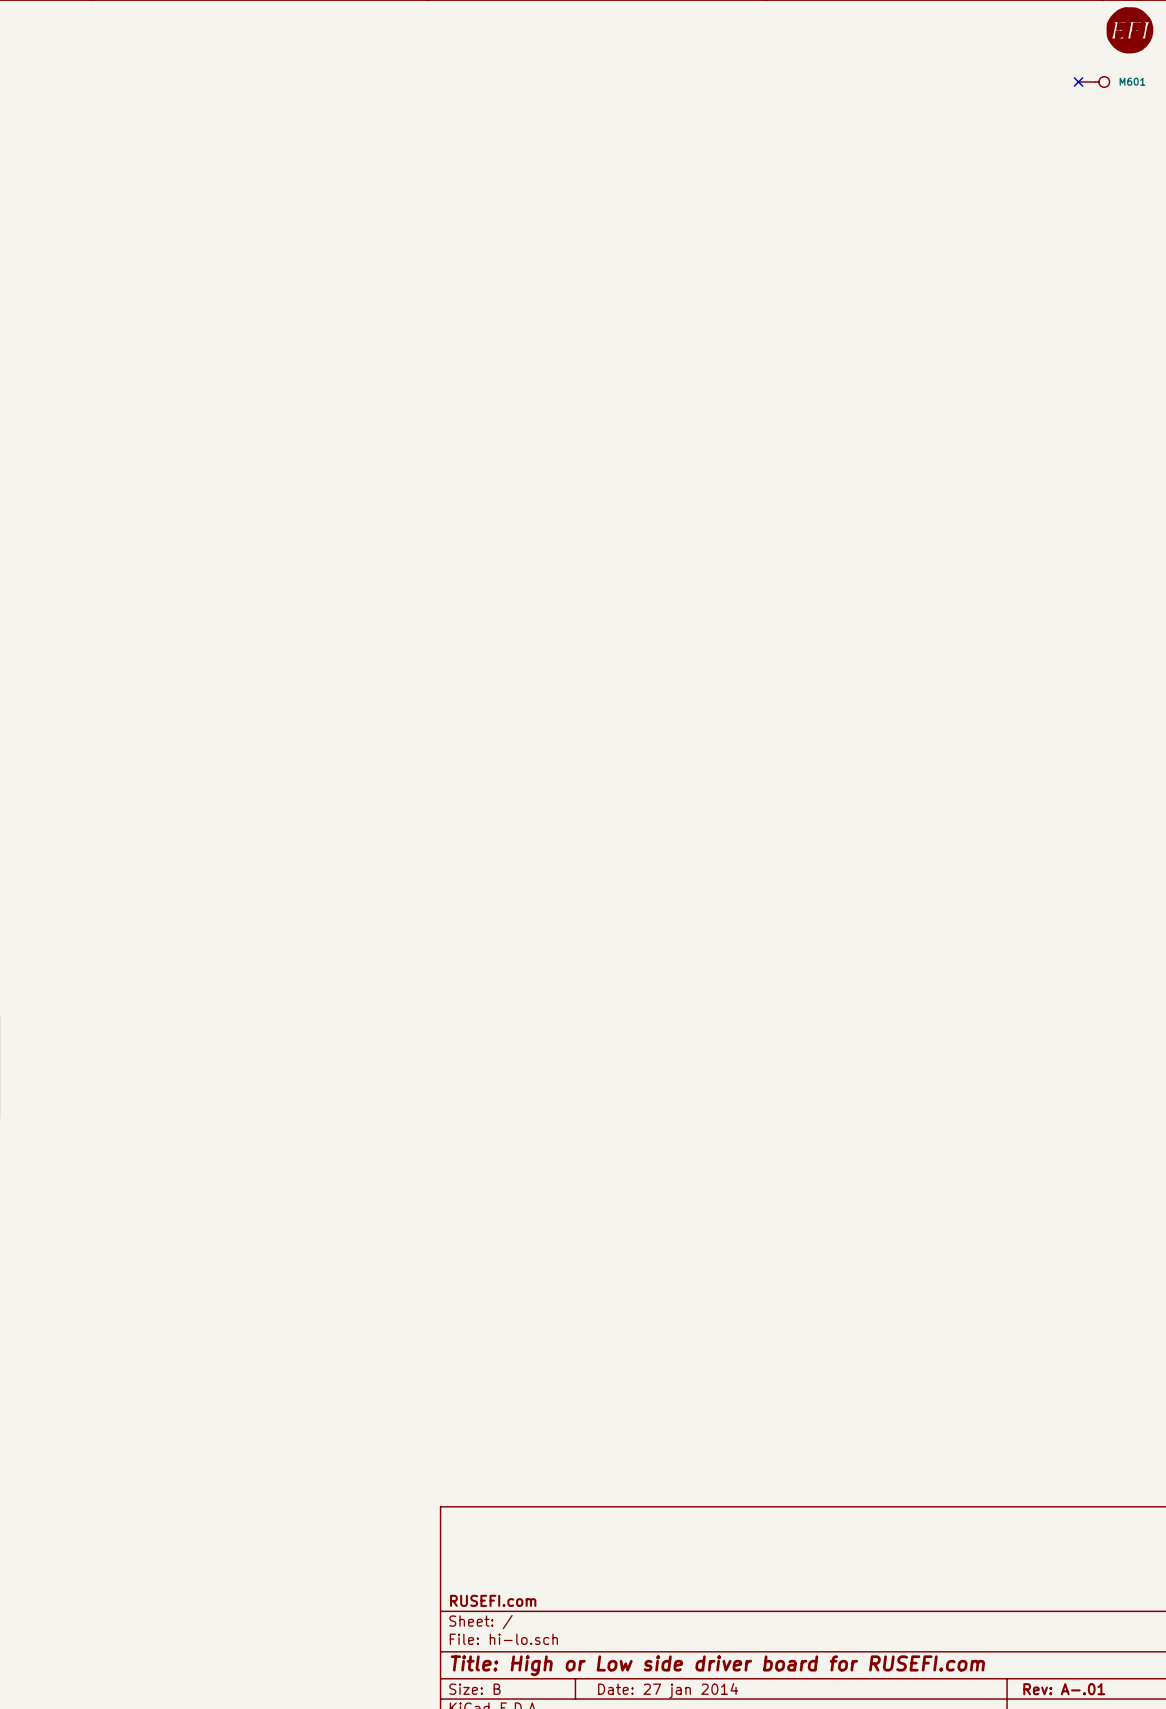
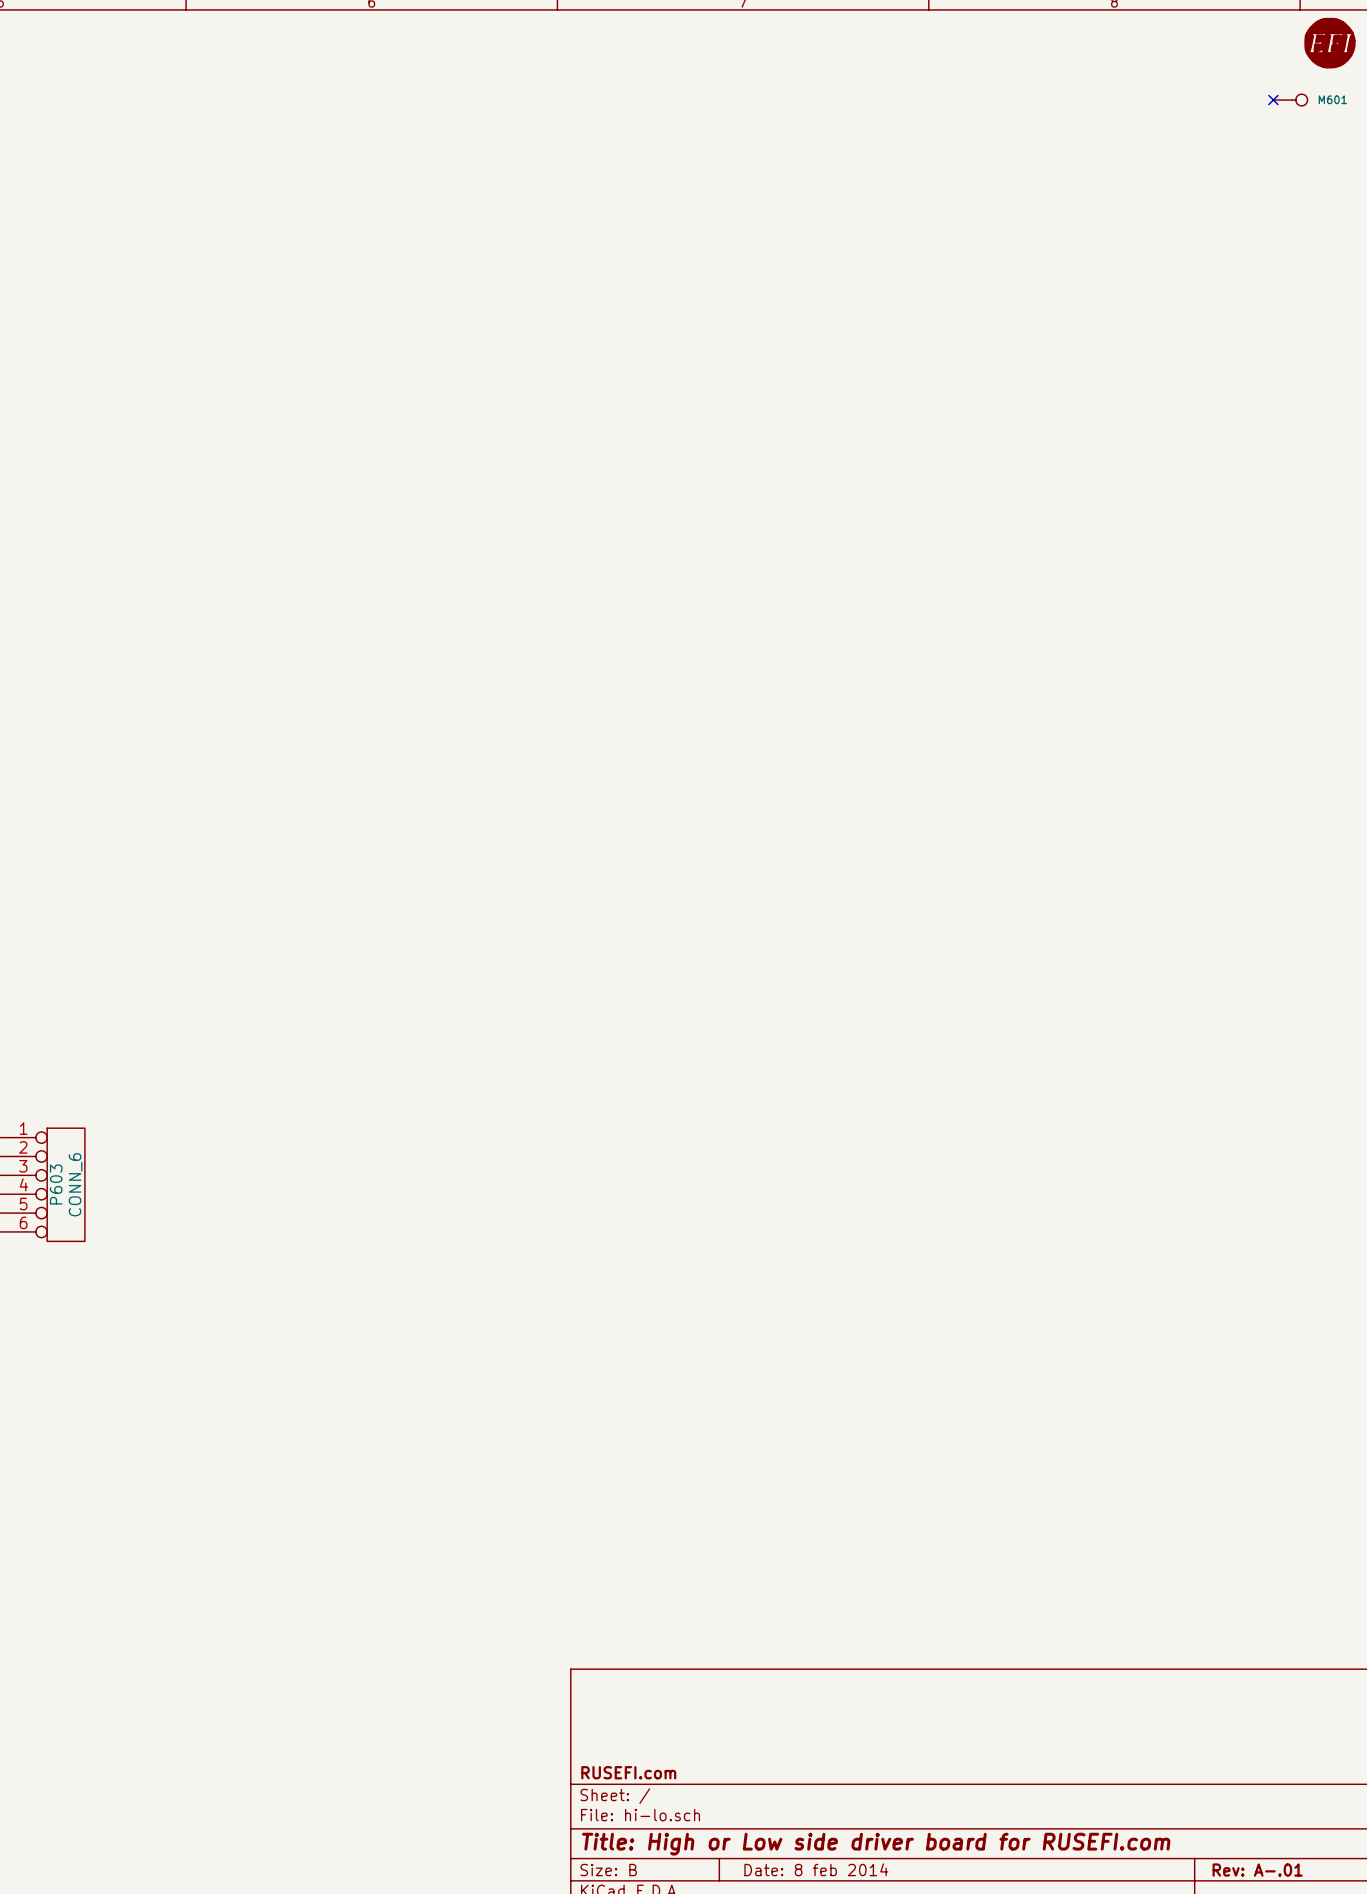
title block: Date: 27 jan 2014 (668, 1690) -> Date: 8 feb 2014 (816, 1869)

